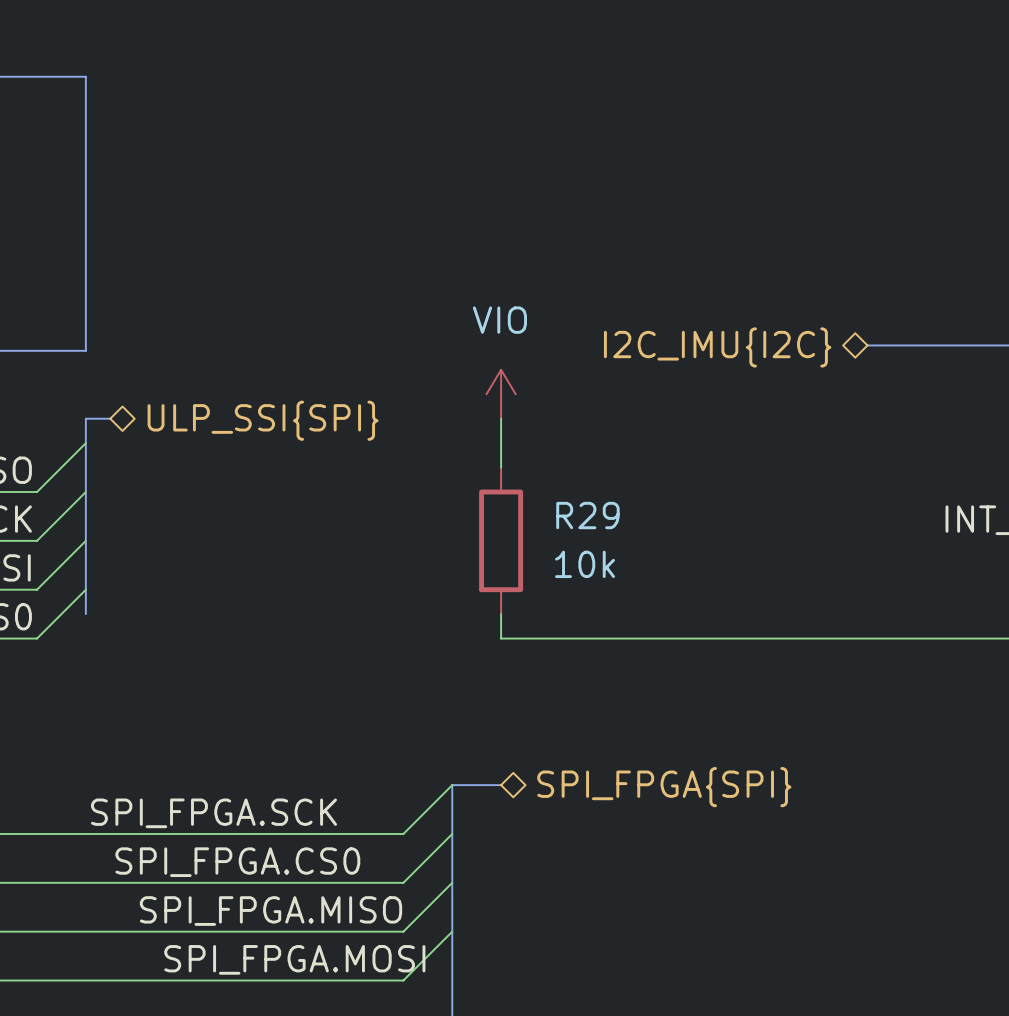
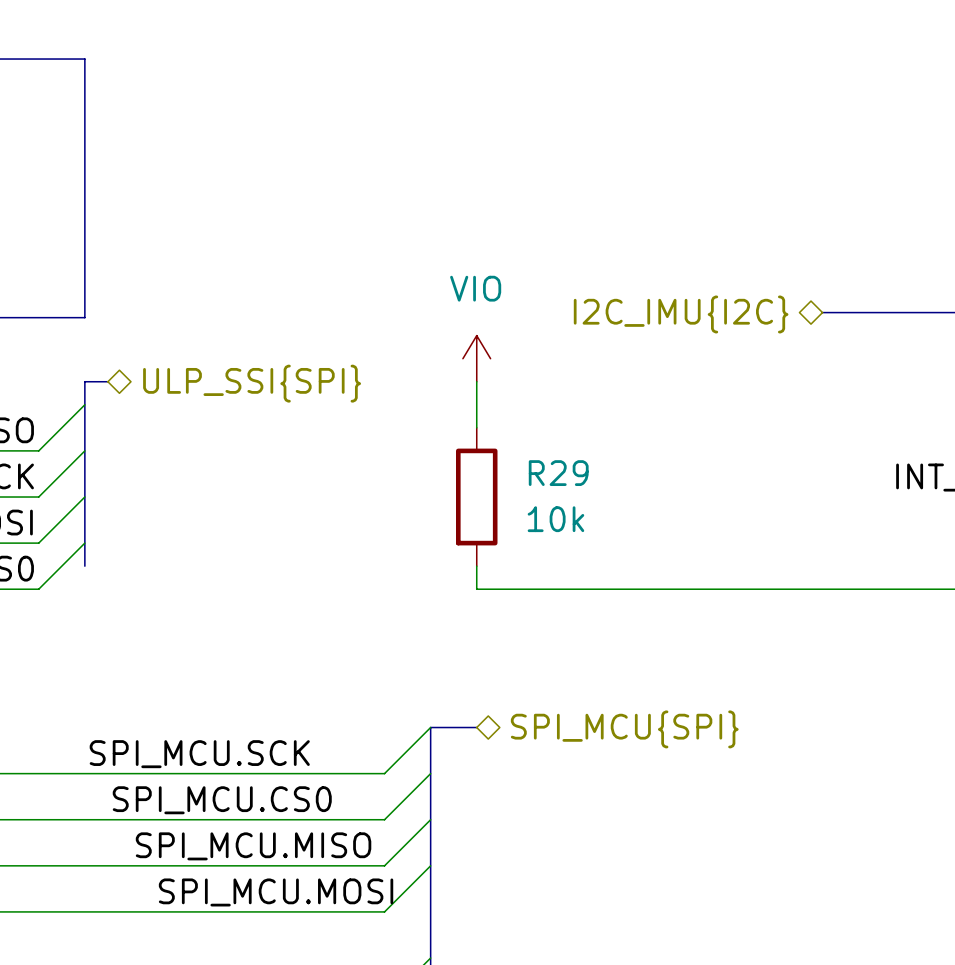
hierarchical label: SPI_FPGA{SPI} (664, 787) -> SPI_MCU{SPI} (624, 729)
label: SPI_FPGA.SCK (214, 813) -> SPI_MCU.SCK (199, 754)
label: SPI_FPGA.CS0 (237, 862) -> SPI_MCU.CS0 (222, 800)
label: SPI_FPGA.MISO (270, 911) -> SPI_MCU.MISO (253, 846)
label: SPI_FPGA.MOSI (294, 959) -> SPI_MCU.MOSI (276, 892)

